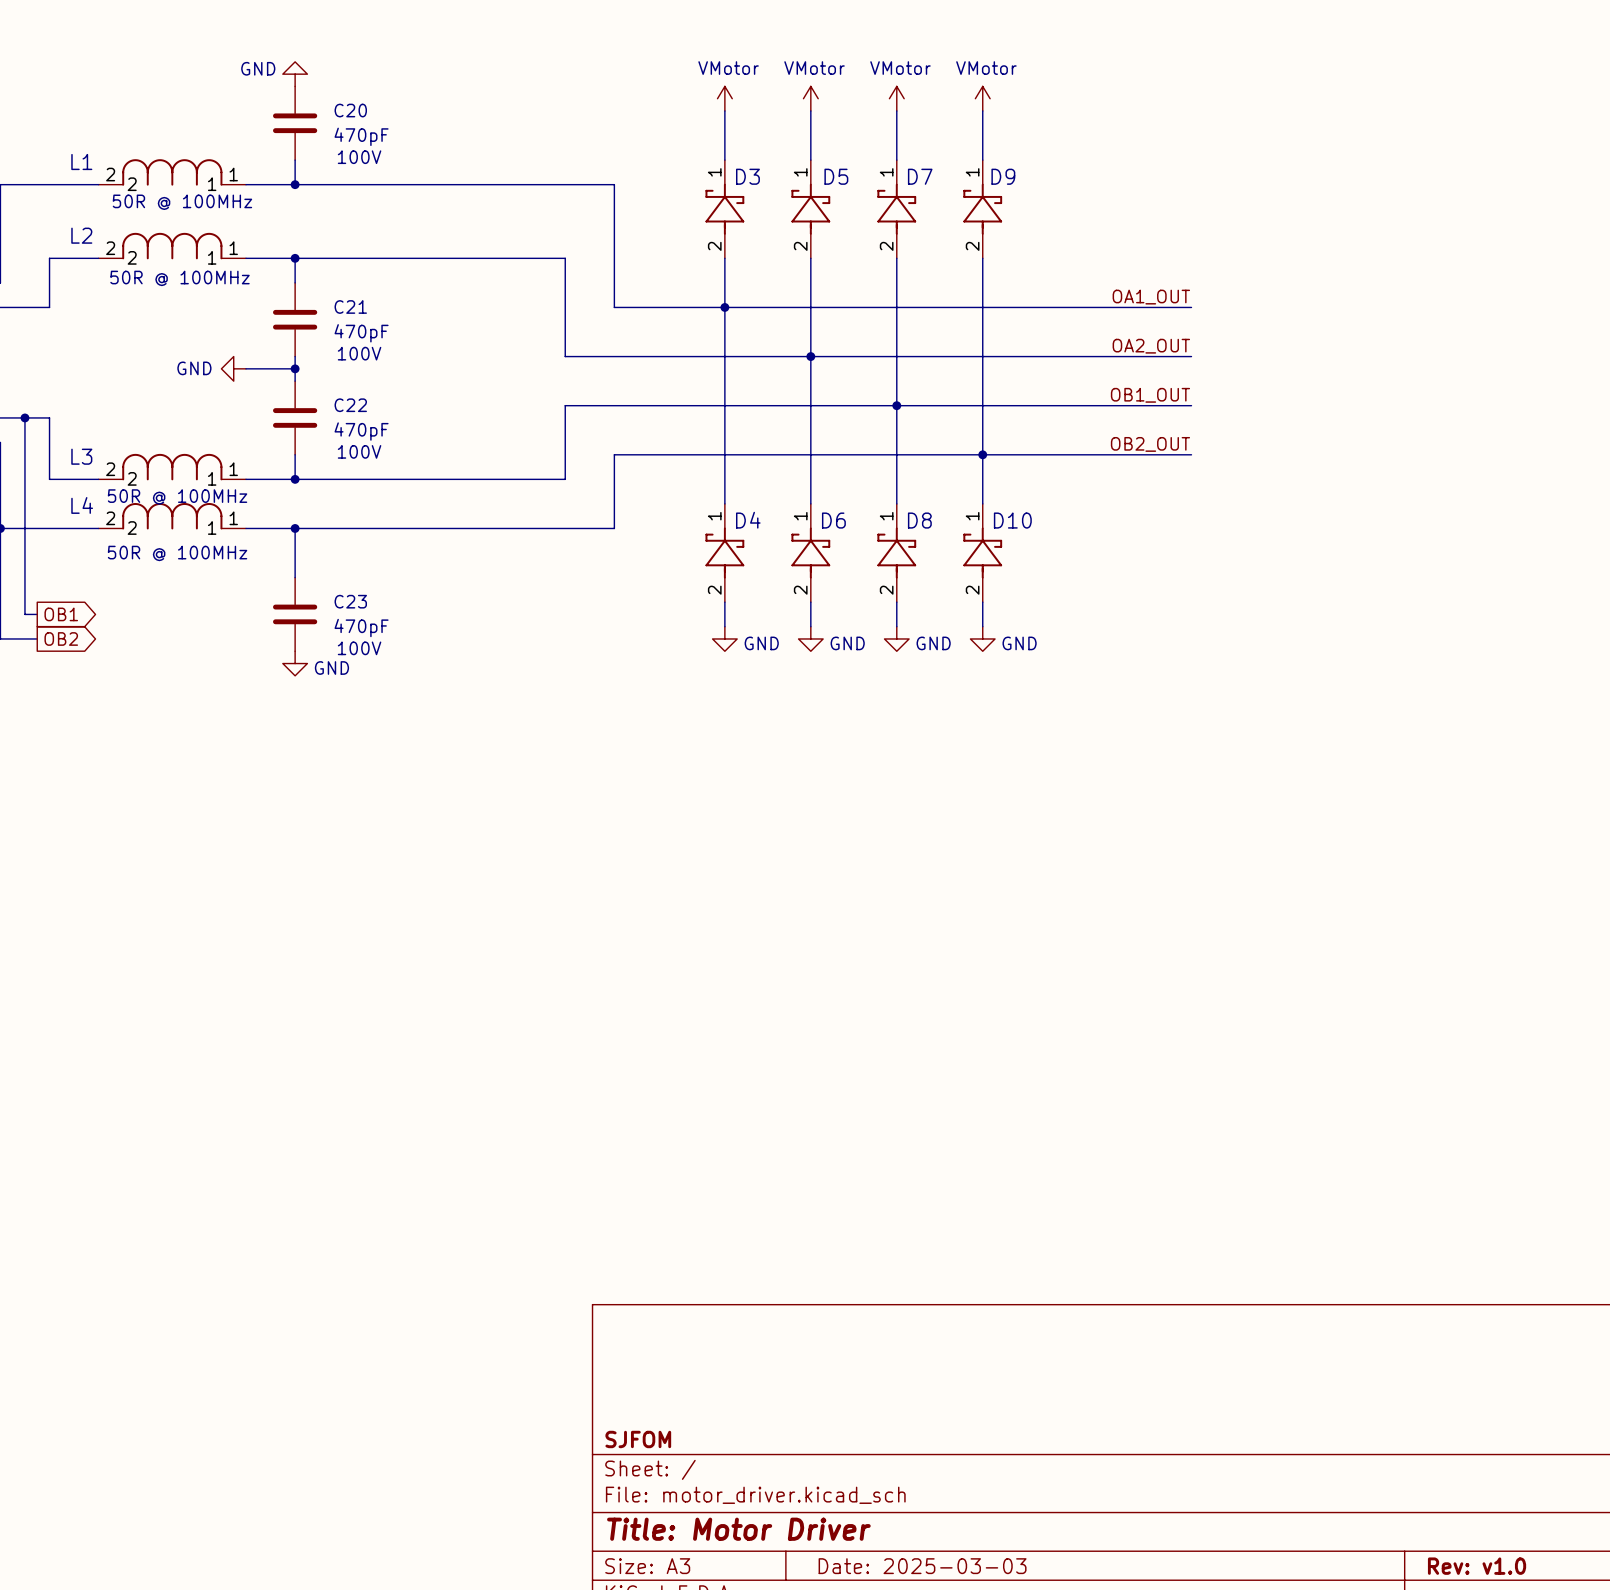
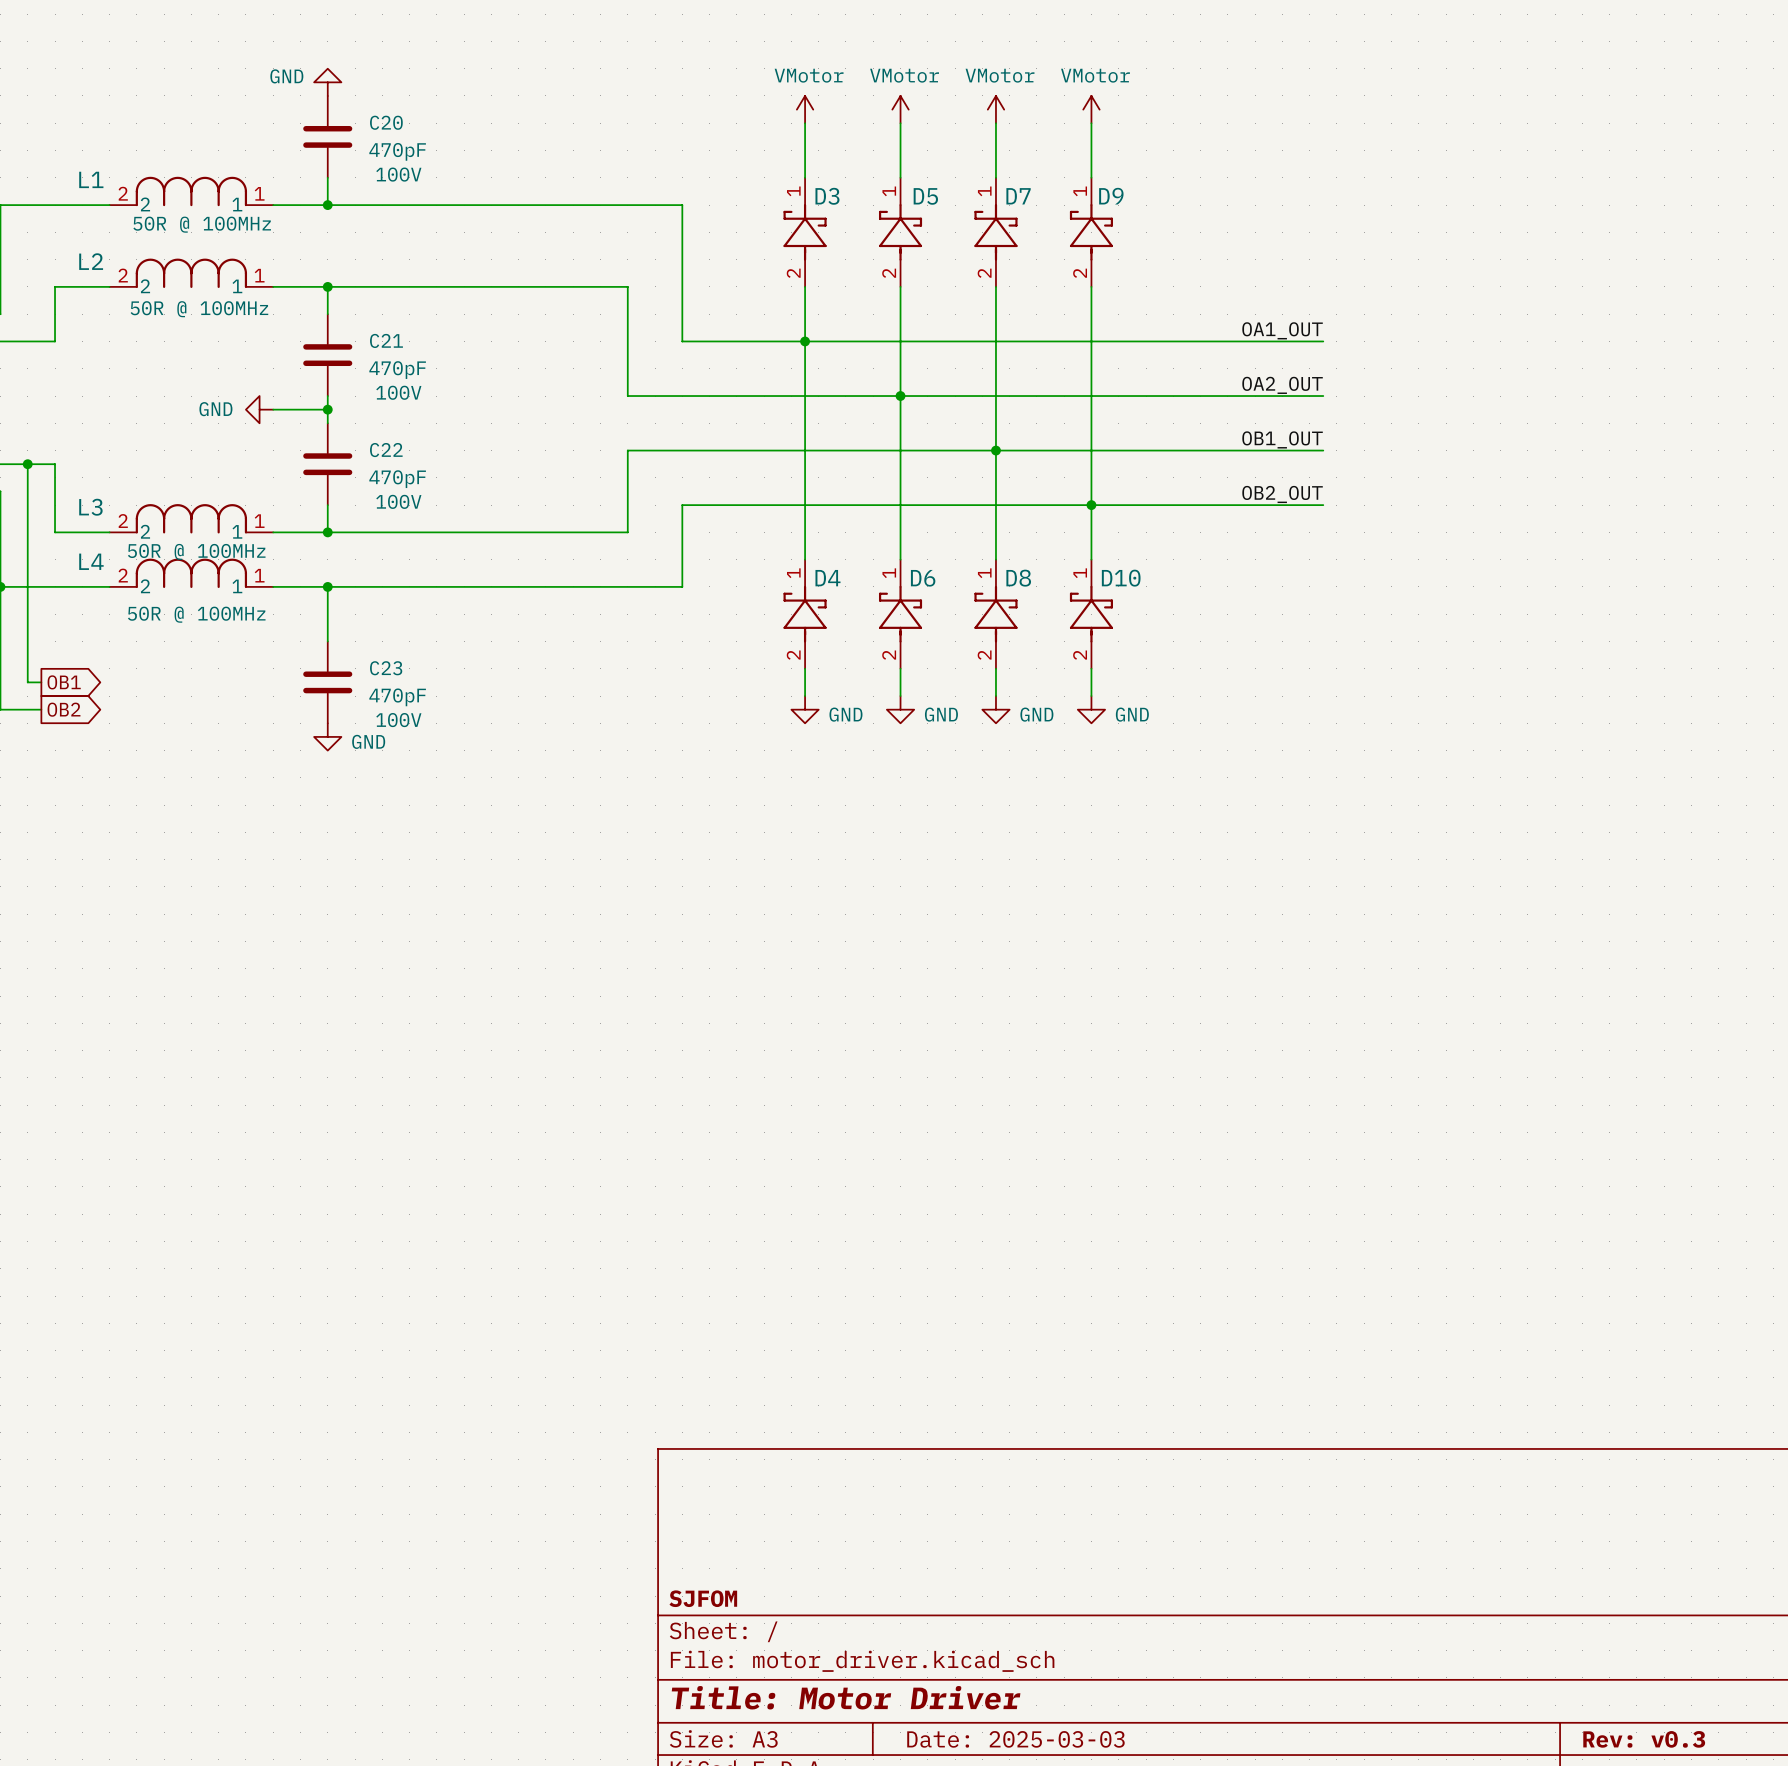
title block: Rev: v1.0 (1477, 1566) -> Rev: v0.3 (1644, 1739)

